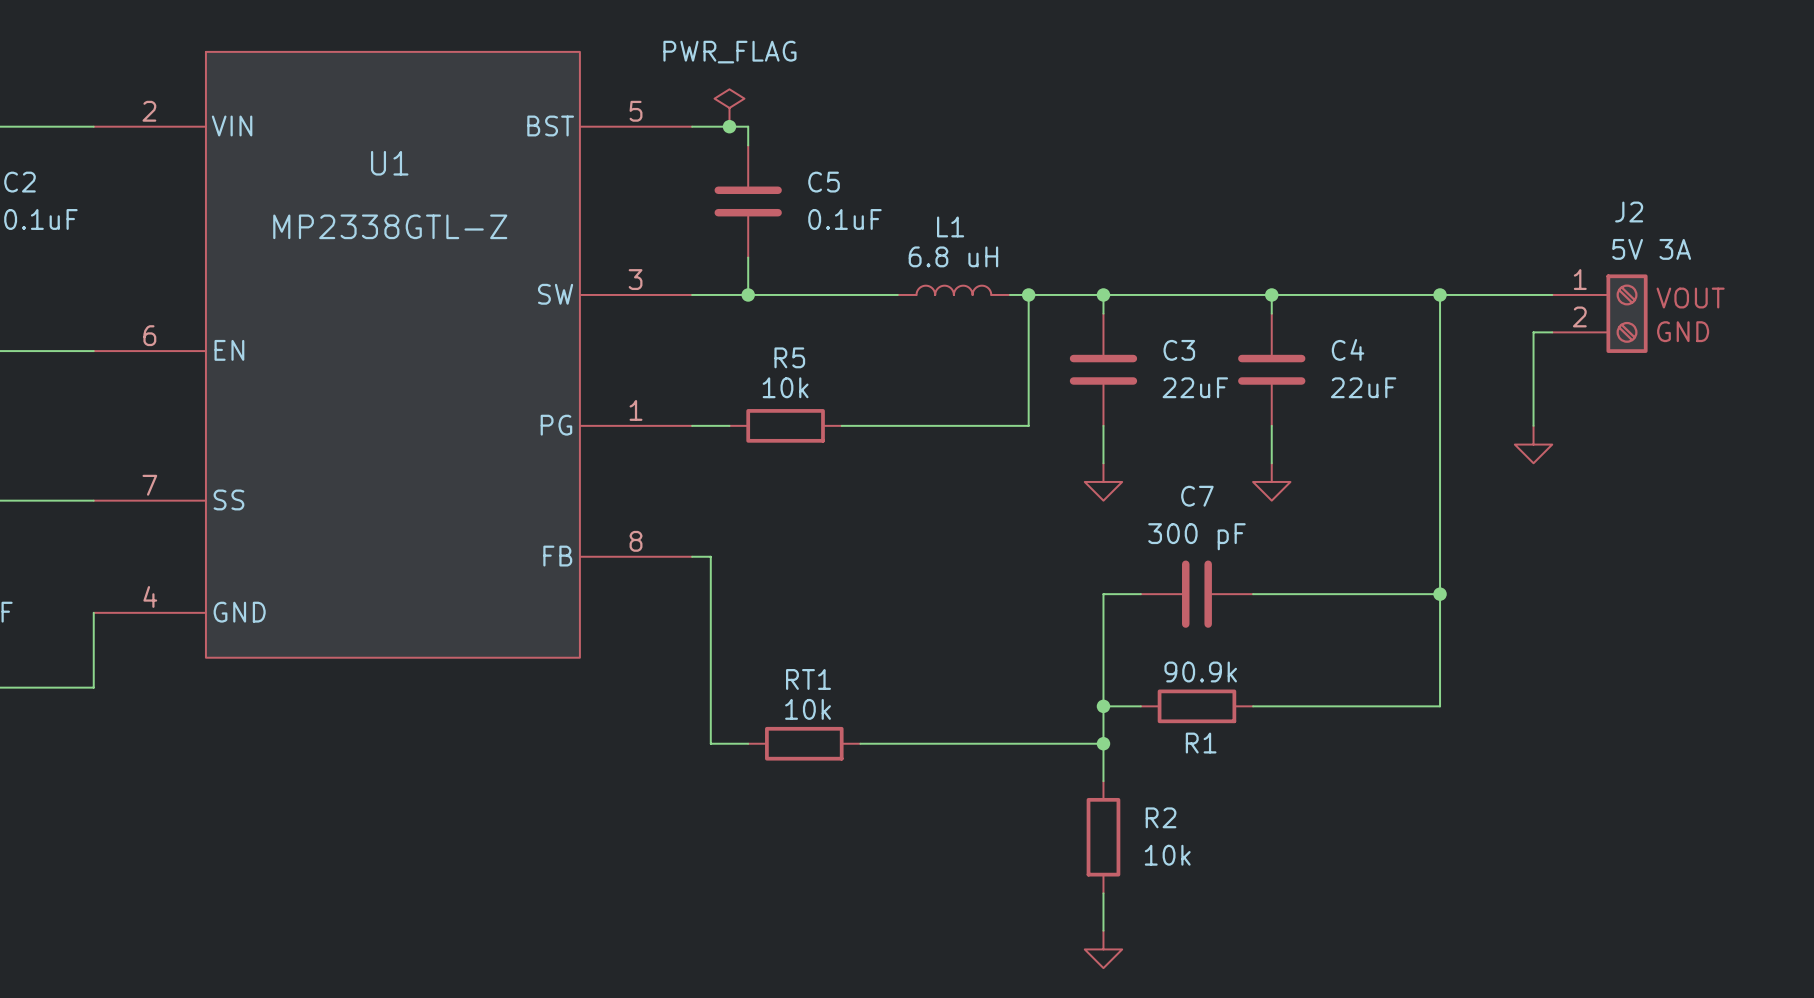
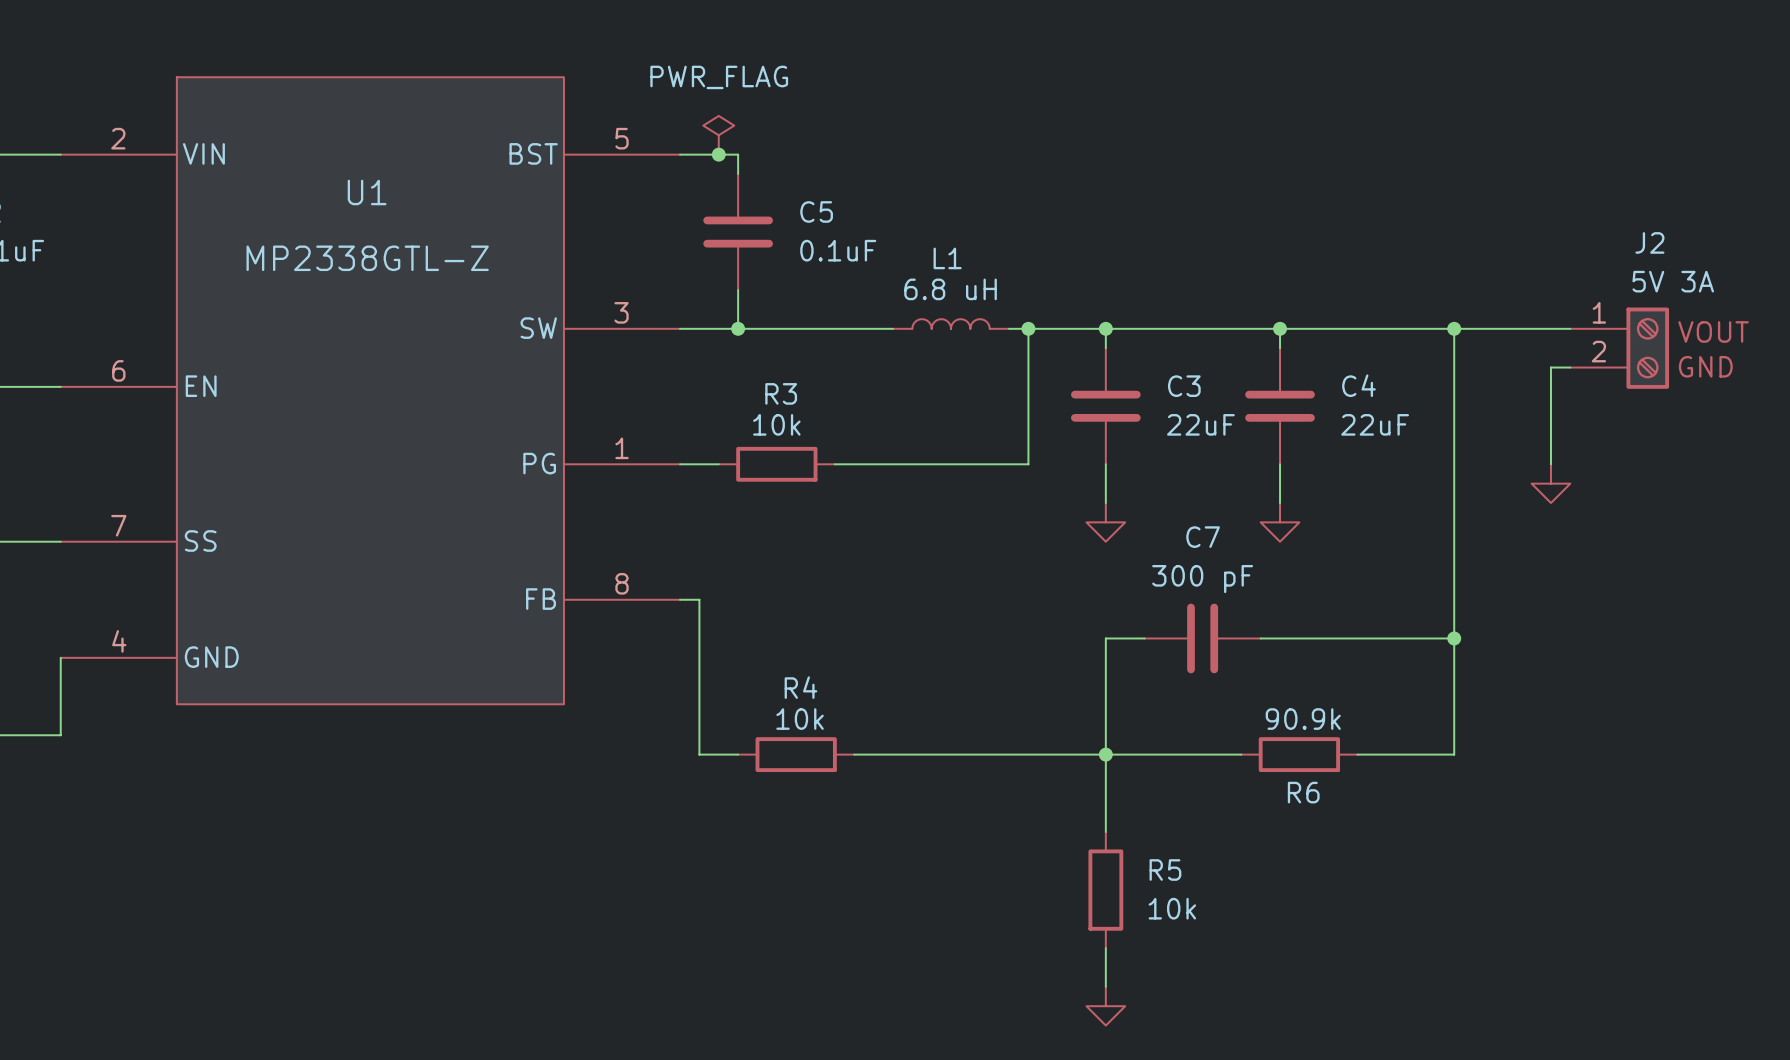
R5 name: R5 (789, 357) -> R3 (781, 393)
wire: (710, 706) (710, 743) (748, 743) -> (699, 754) (738, 754)
R4: none -> 10k (796, 754)
R1: 90.9k (1196, 706) -> none
wire: (1253, 706) (1346, 706) -> (1144, 754) (1241, 754)
R6: none -> 90.9k (1299, 754)
RT1: 10k (804, 743) -> none
wire: (860, 743) (1103, 743) -> (854, 754) (1105, 754)
junction: (1103, 743) -> none
R2 name: R2 (1161, 817) -> R5 (1165, 870)

